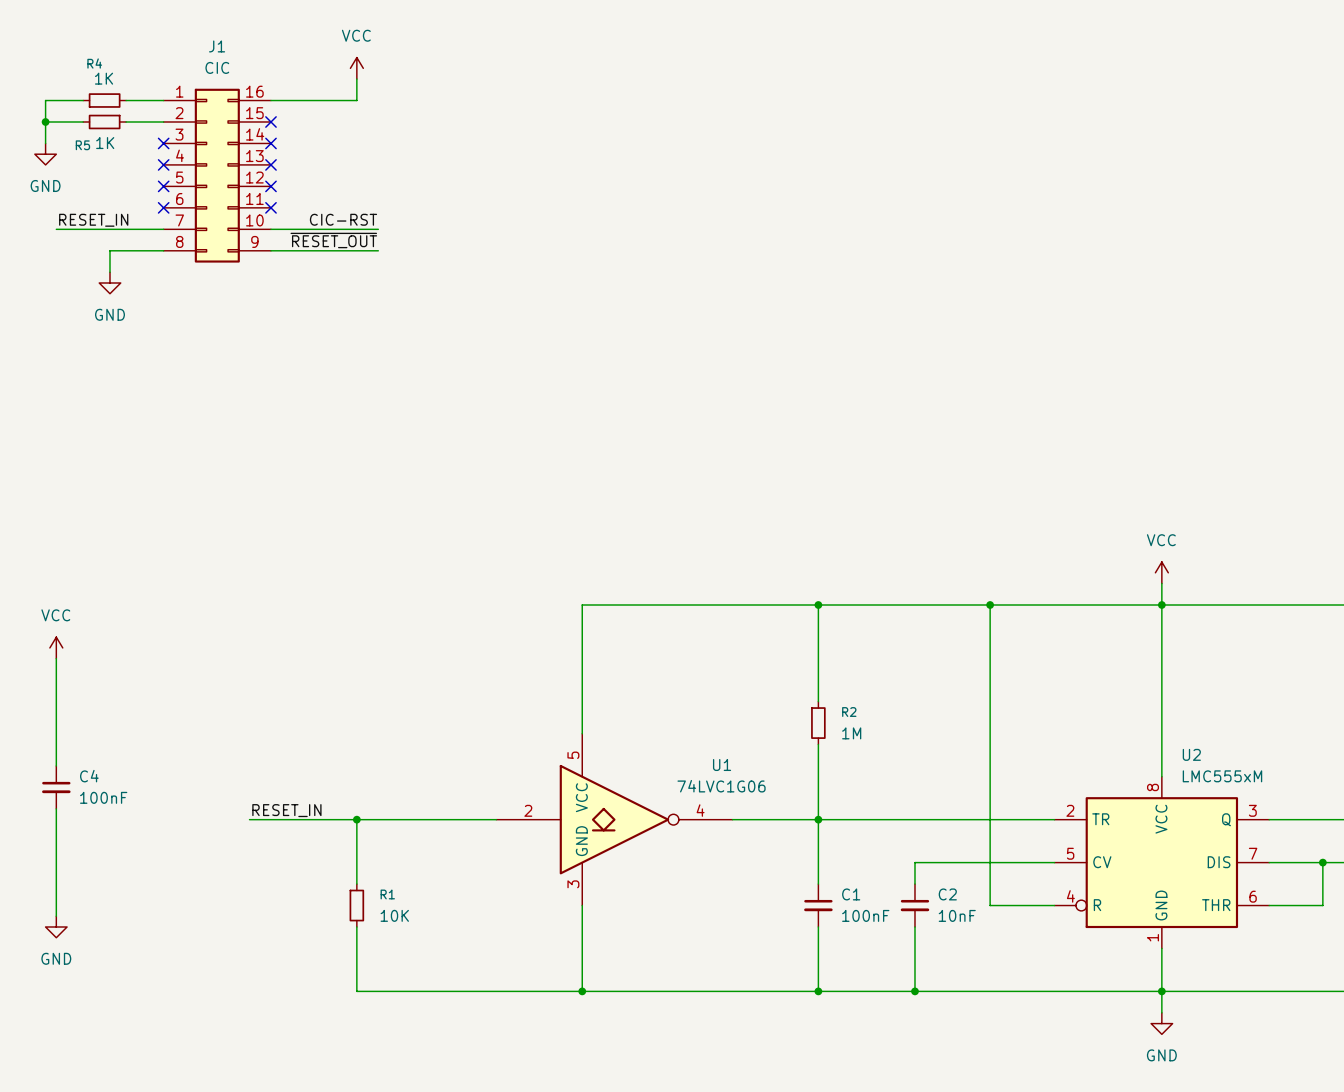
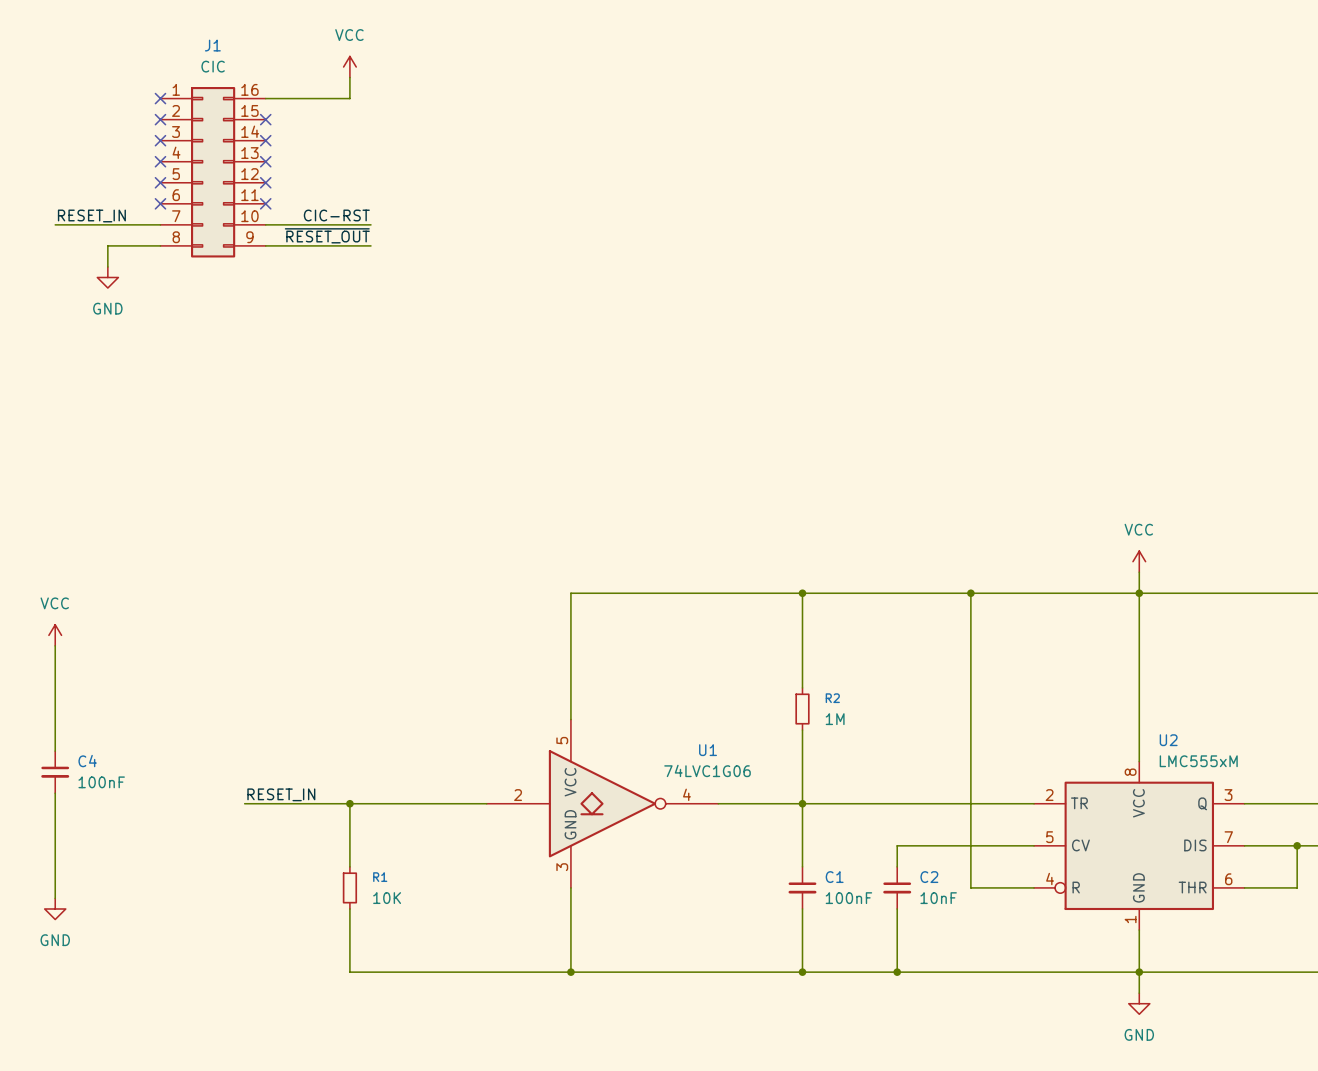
wire: (83, 100) (45, 100) (45, 143) -> none
R4: 1K (104, 100) -> none
wire: (126, 100) (163, 100) -> none
no-connect mark: none -> (160, 98)
wire: (45, 121) (83, 121) -> none
junction: (45, 121) -> none
R5: 1K (104, 121) -> none
wire: (126, 121) (163, 121) -> none
no-connect mark: none -> (160, 119)
power symbol: GND (45, 154) -> none

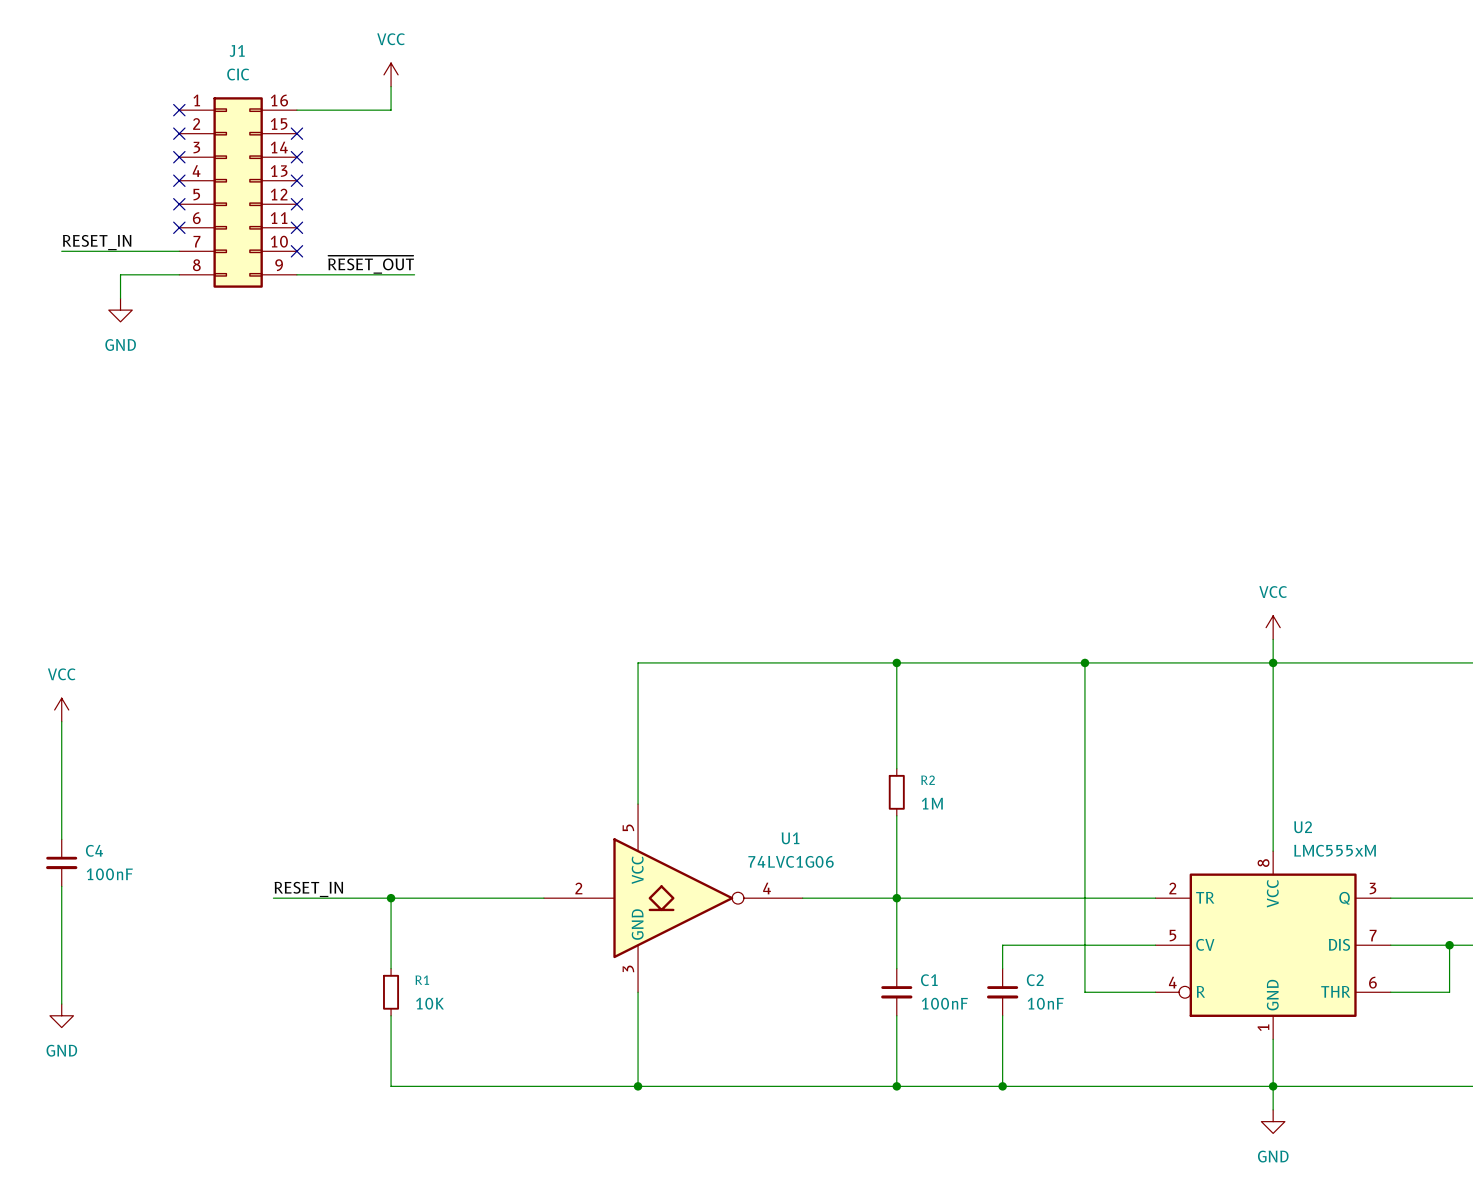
label: CIC-RST (336, 215) -> none
wire: (265, 224) (370, 224) -> none
no-connect mark: none -> (296, 251)

